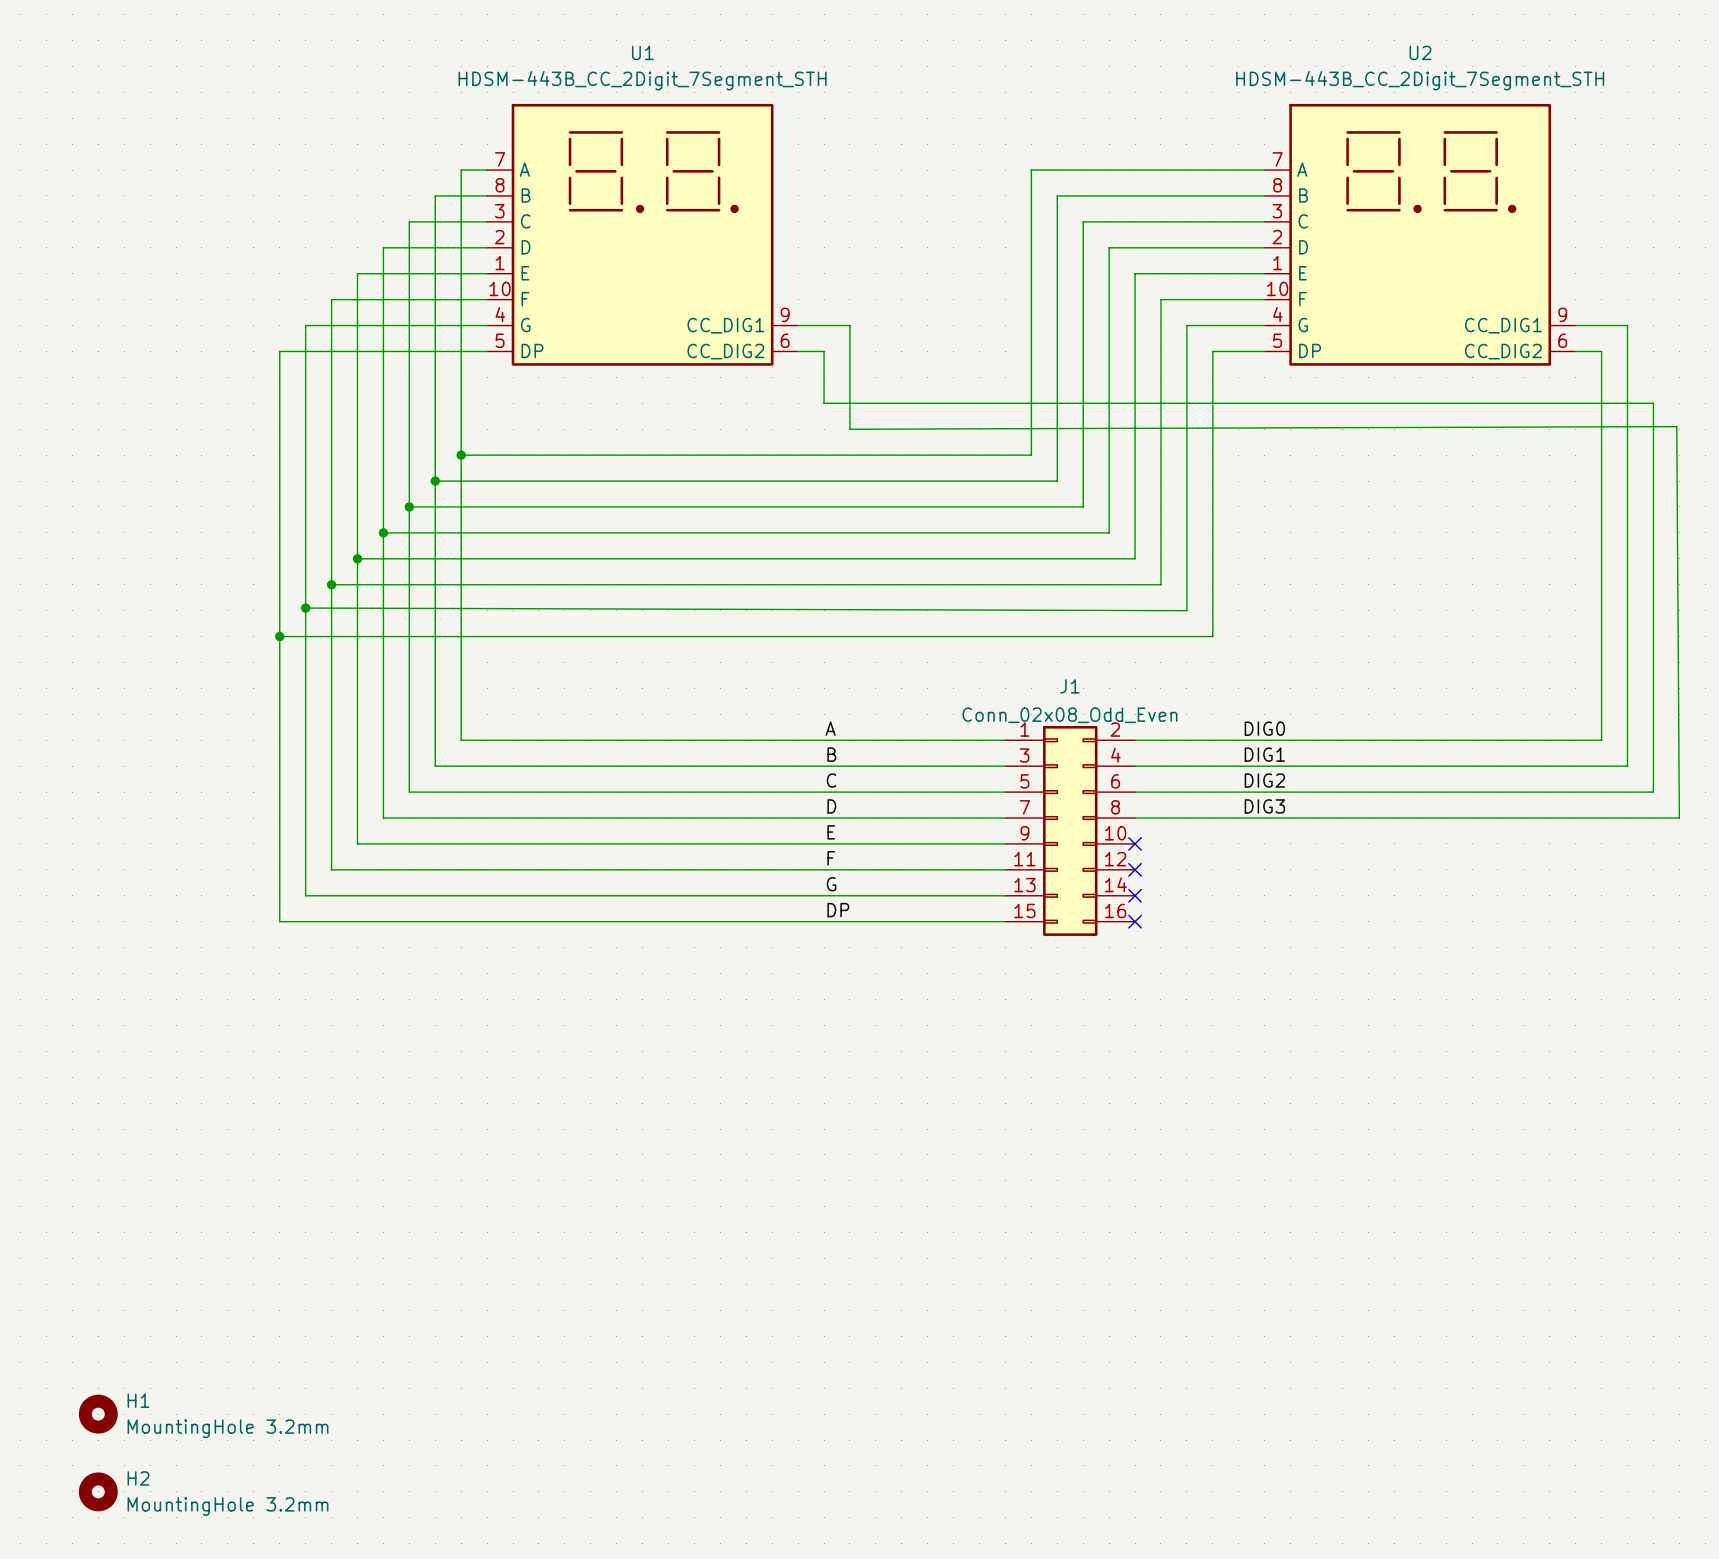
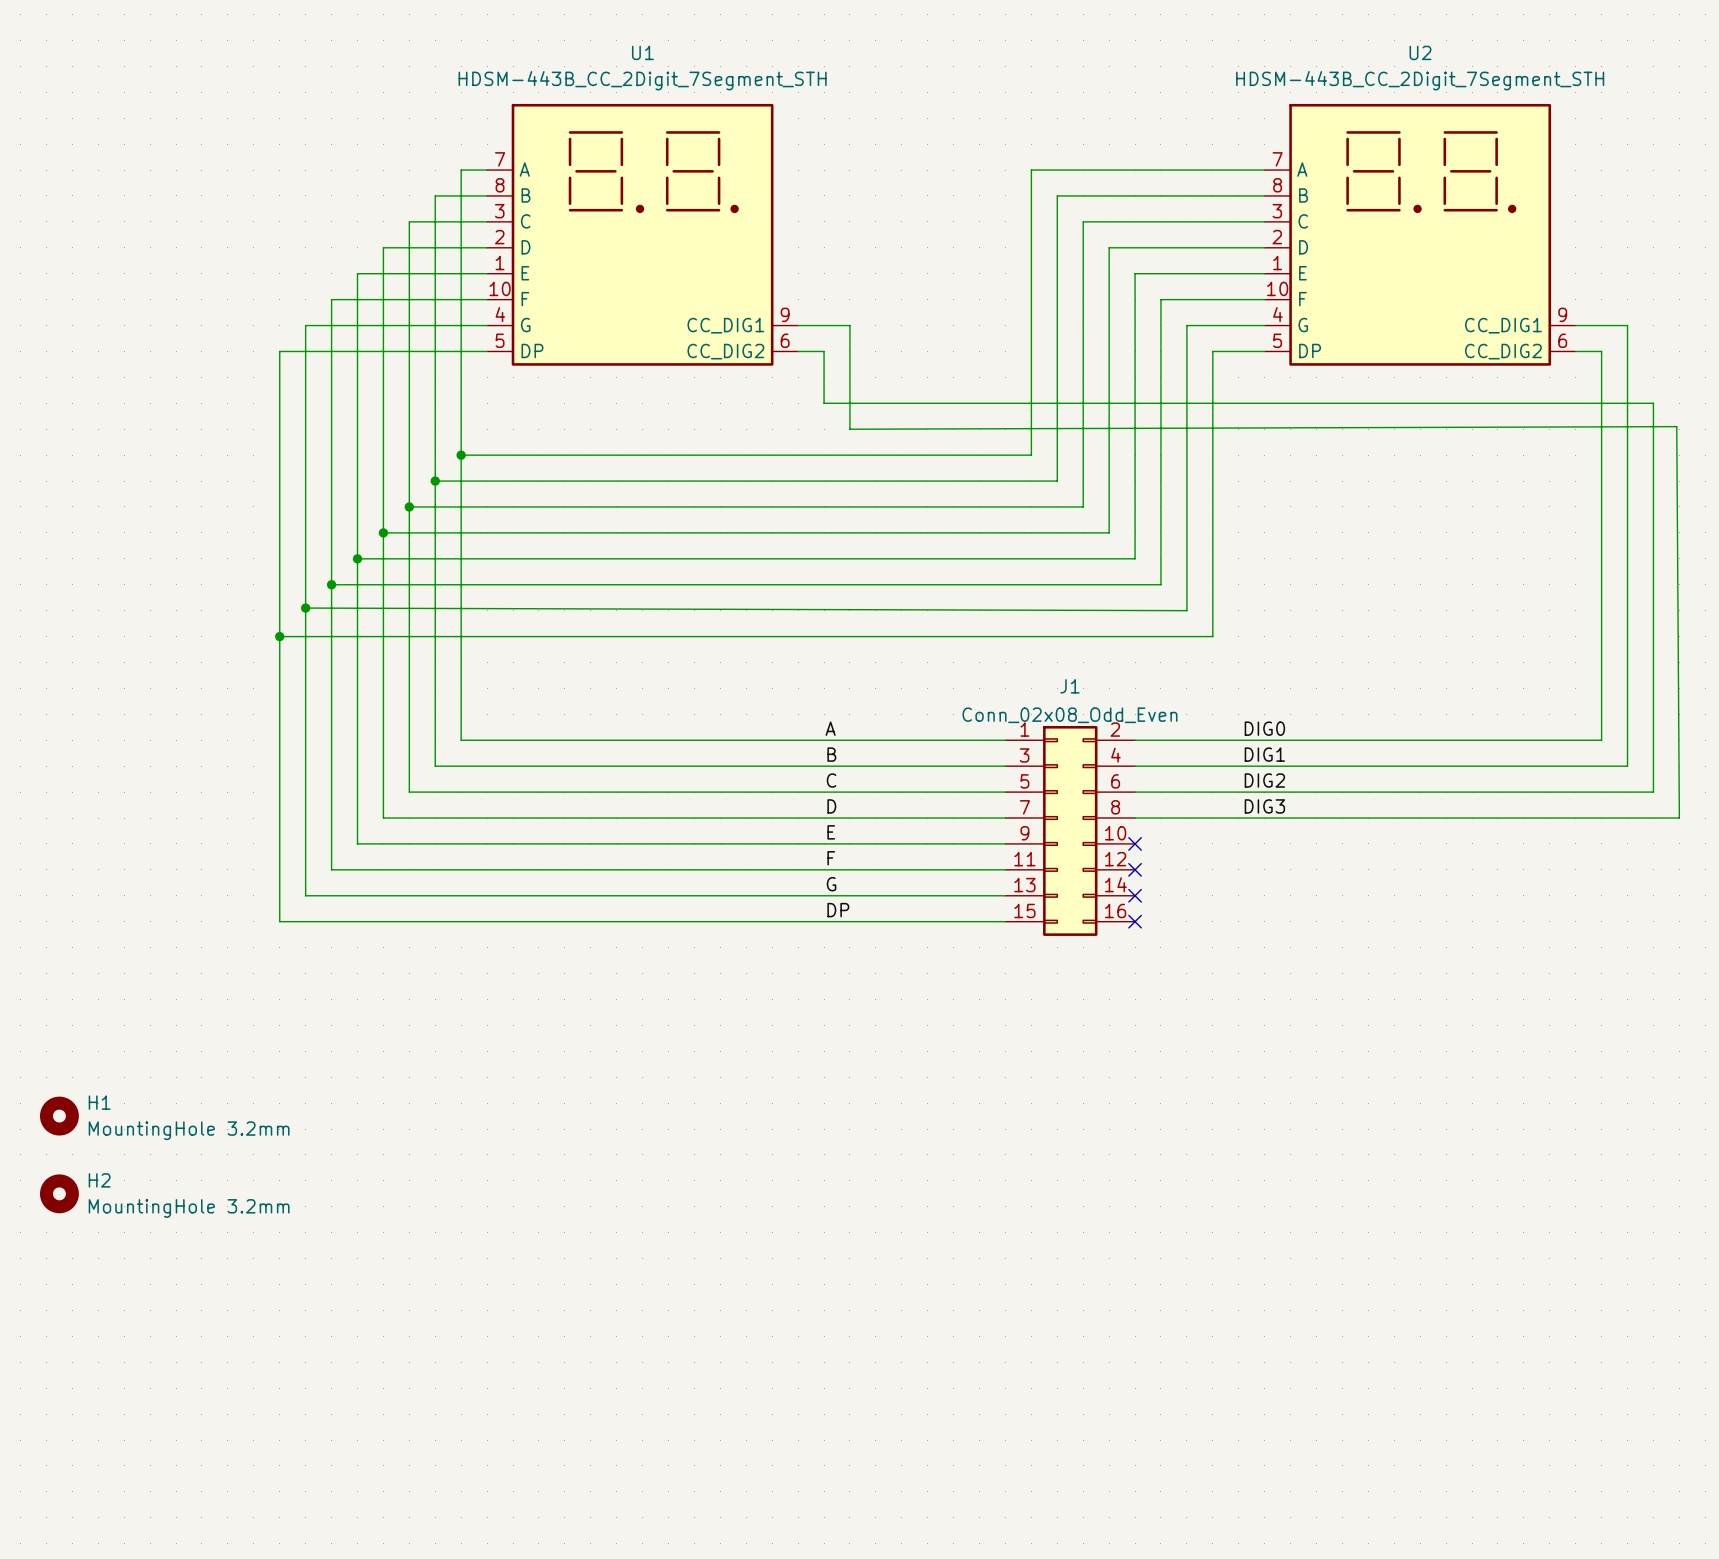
H1 position: (98, 1414) -> (59, 1116)
H2 position: (98, 1491) -> (59, 1193)

